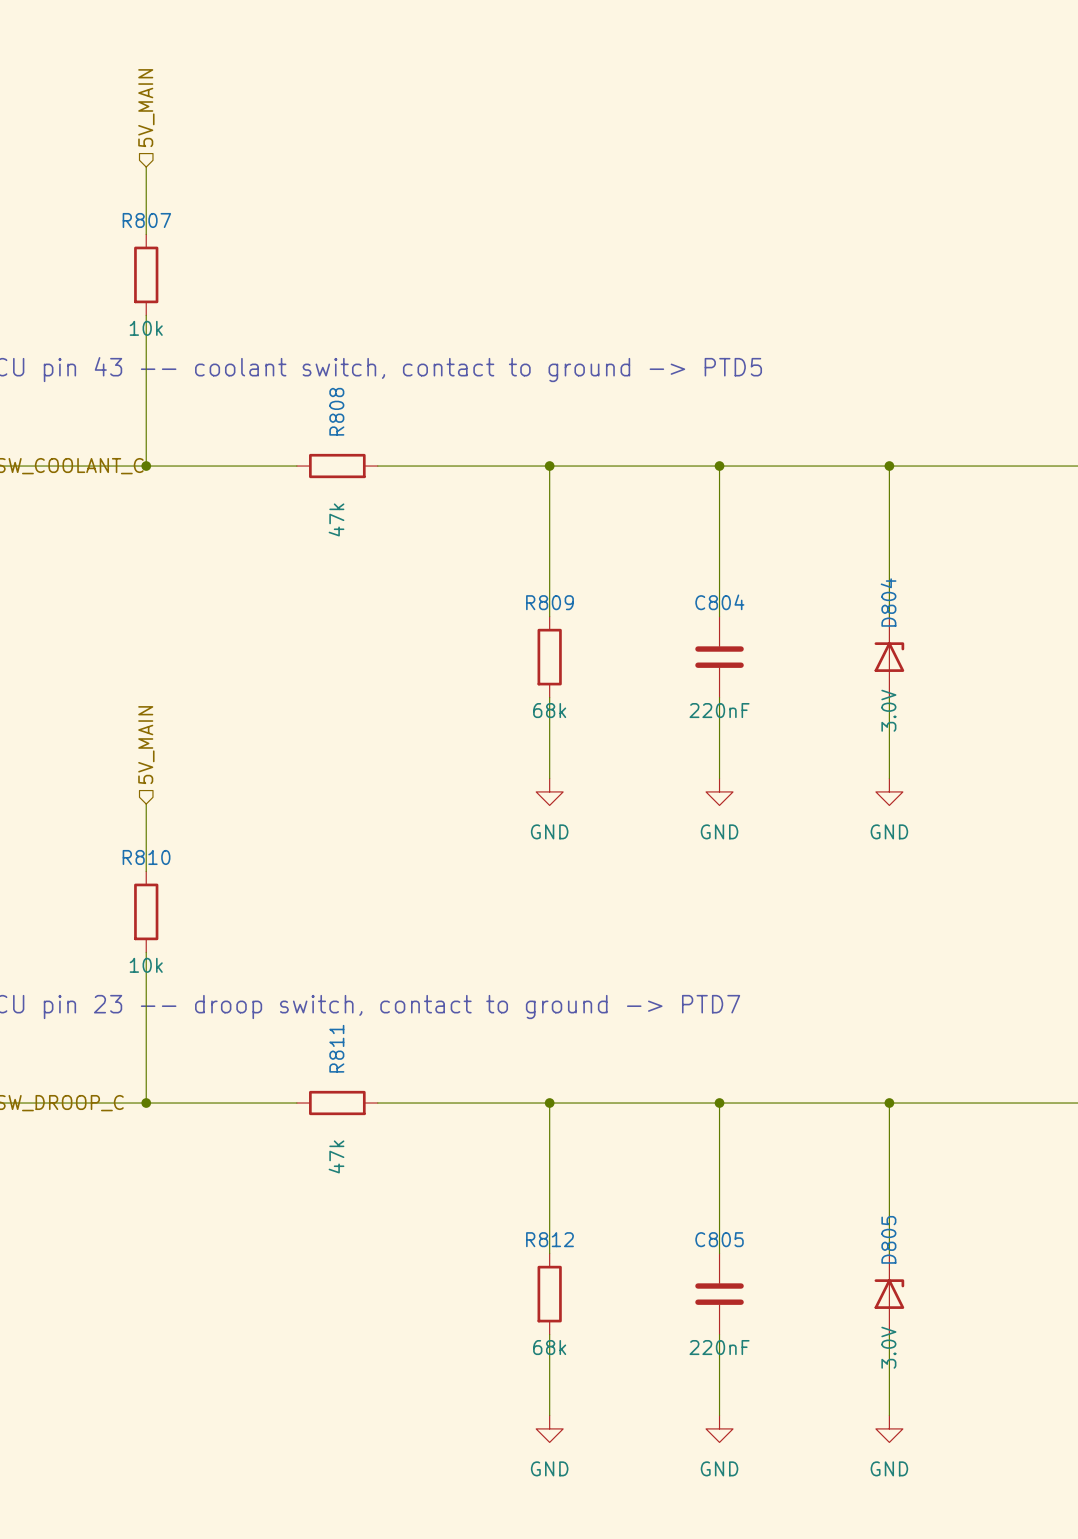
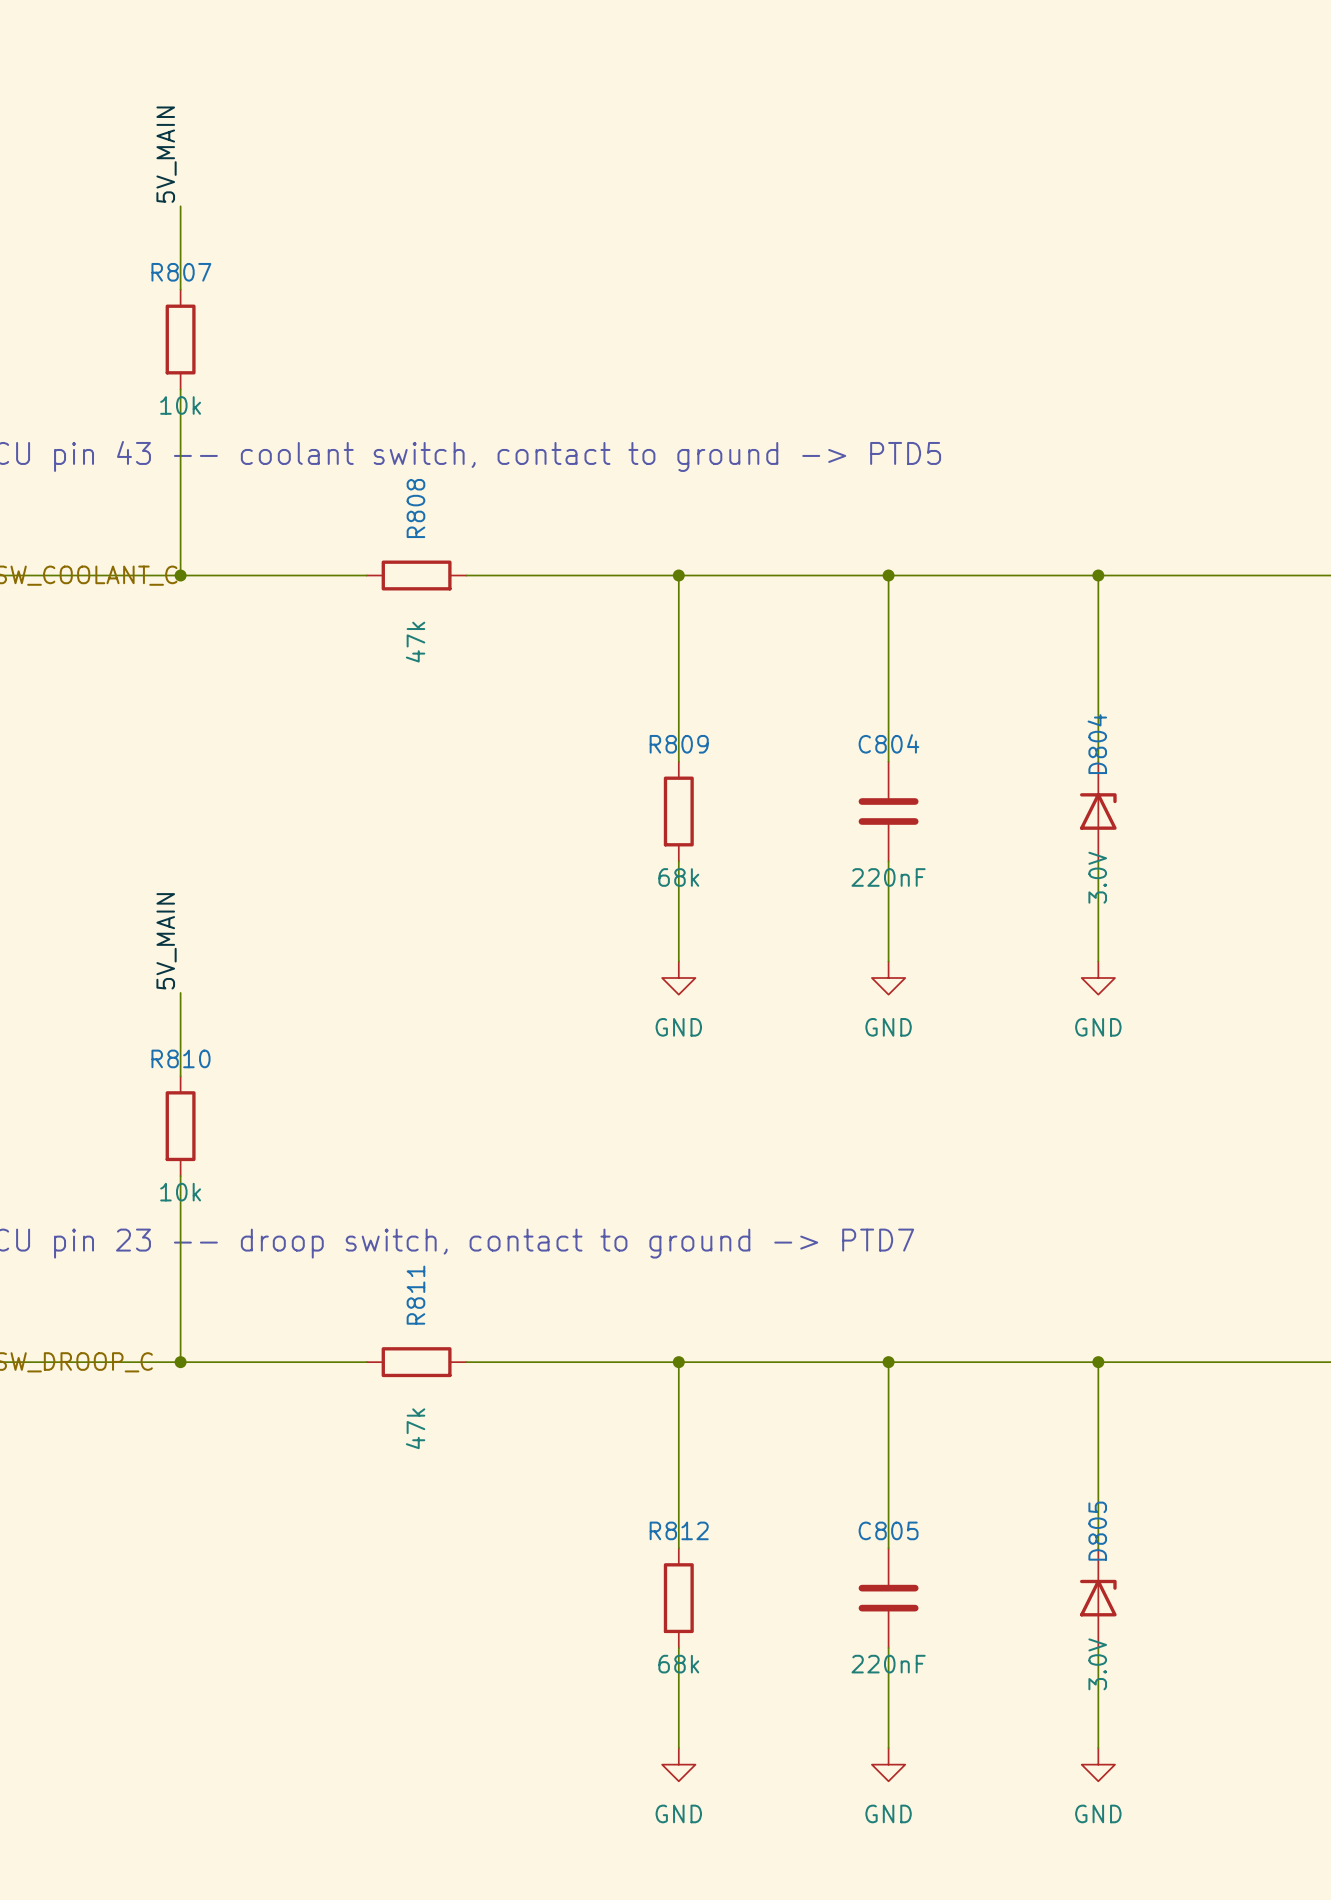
hierarchical label: 5V_MAIN (146, 108) -> none
label: none -> 5V_MAIN (166, 154)
hierarchical label: 5V_MAIN (146, 745) -> none
label: none -> 5V_MAIN (166, 941)

